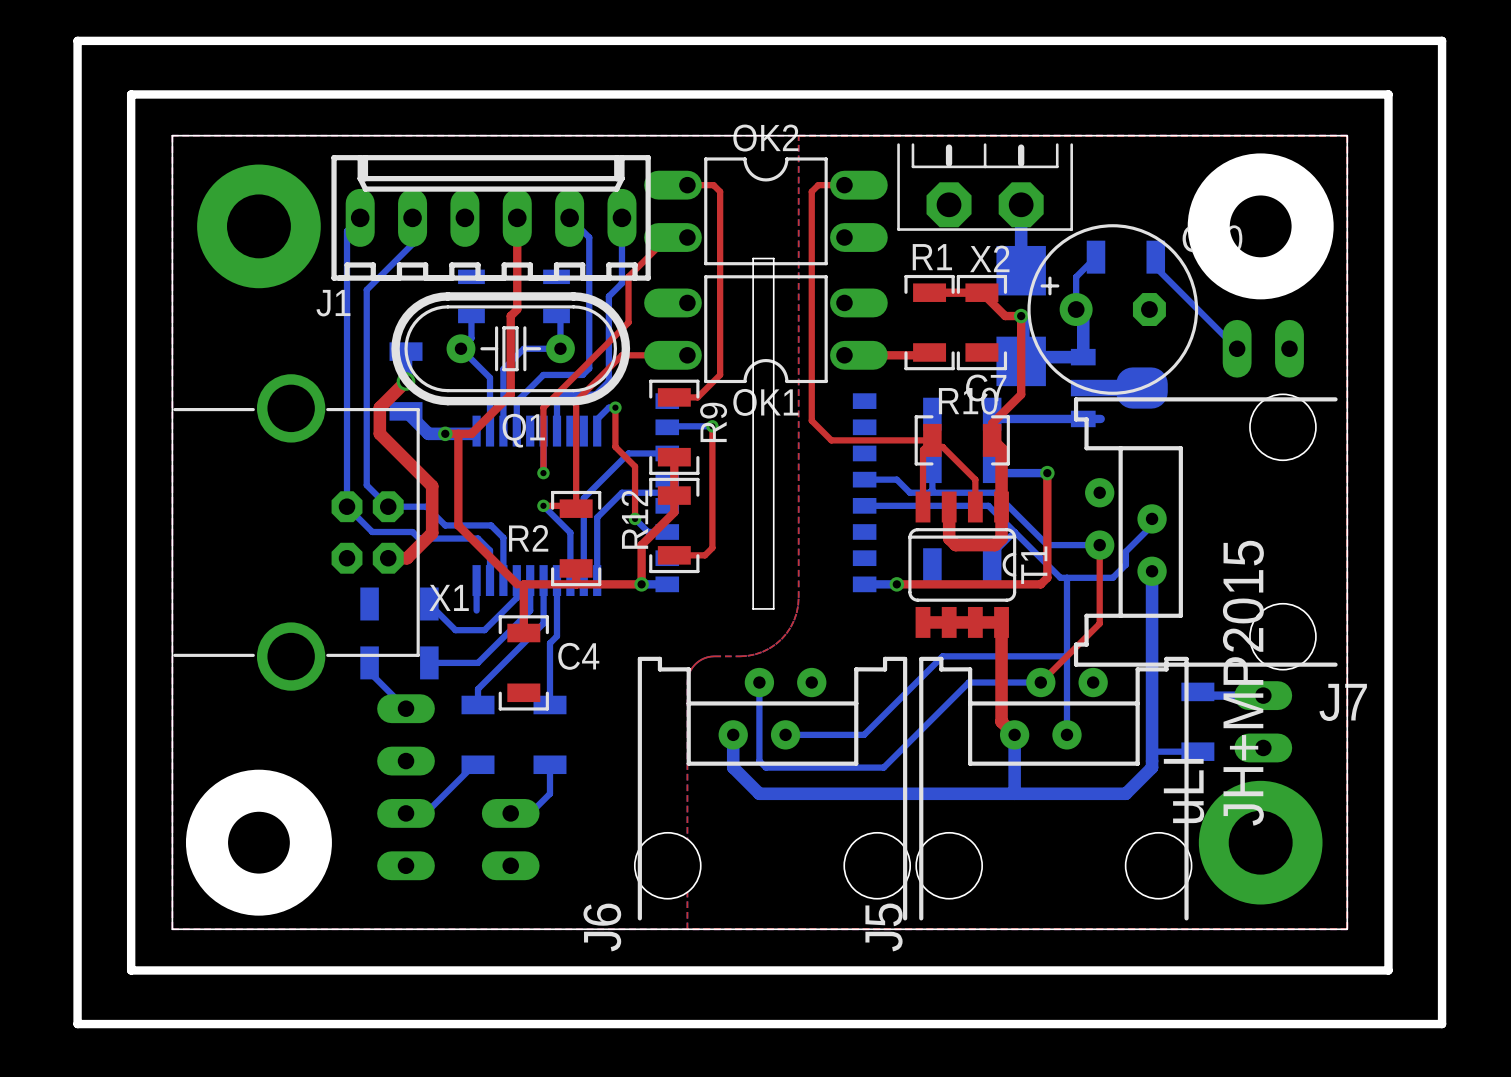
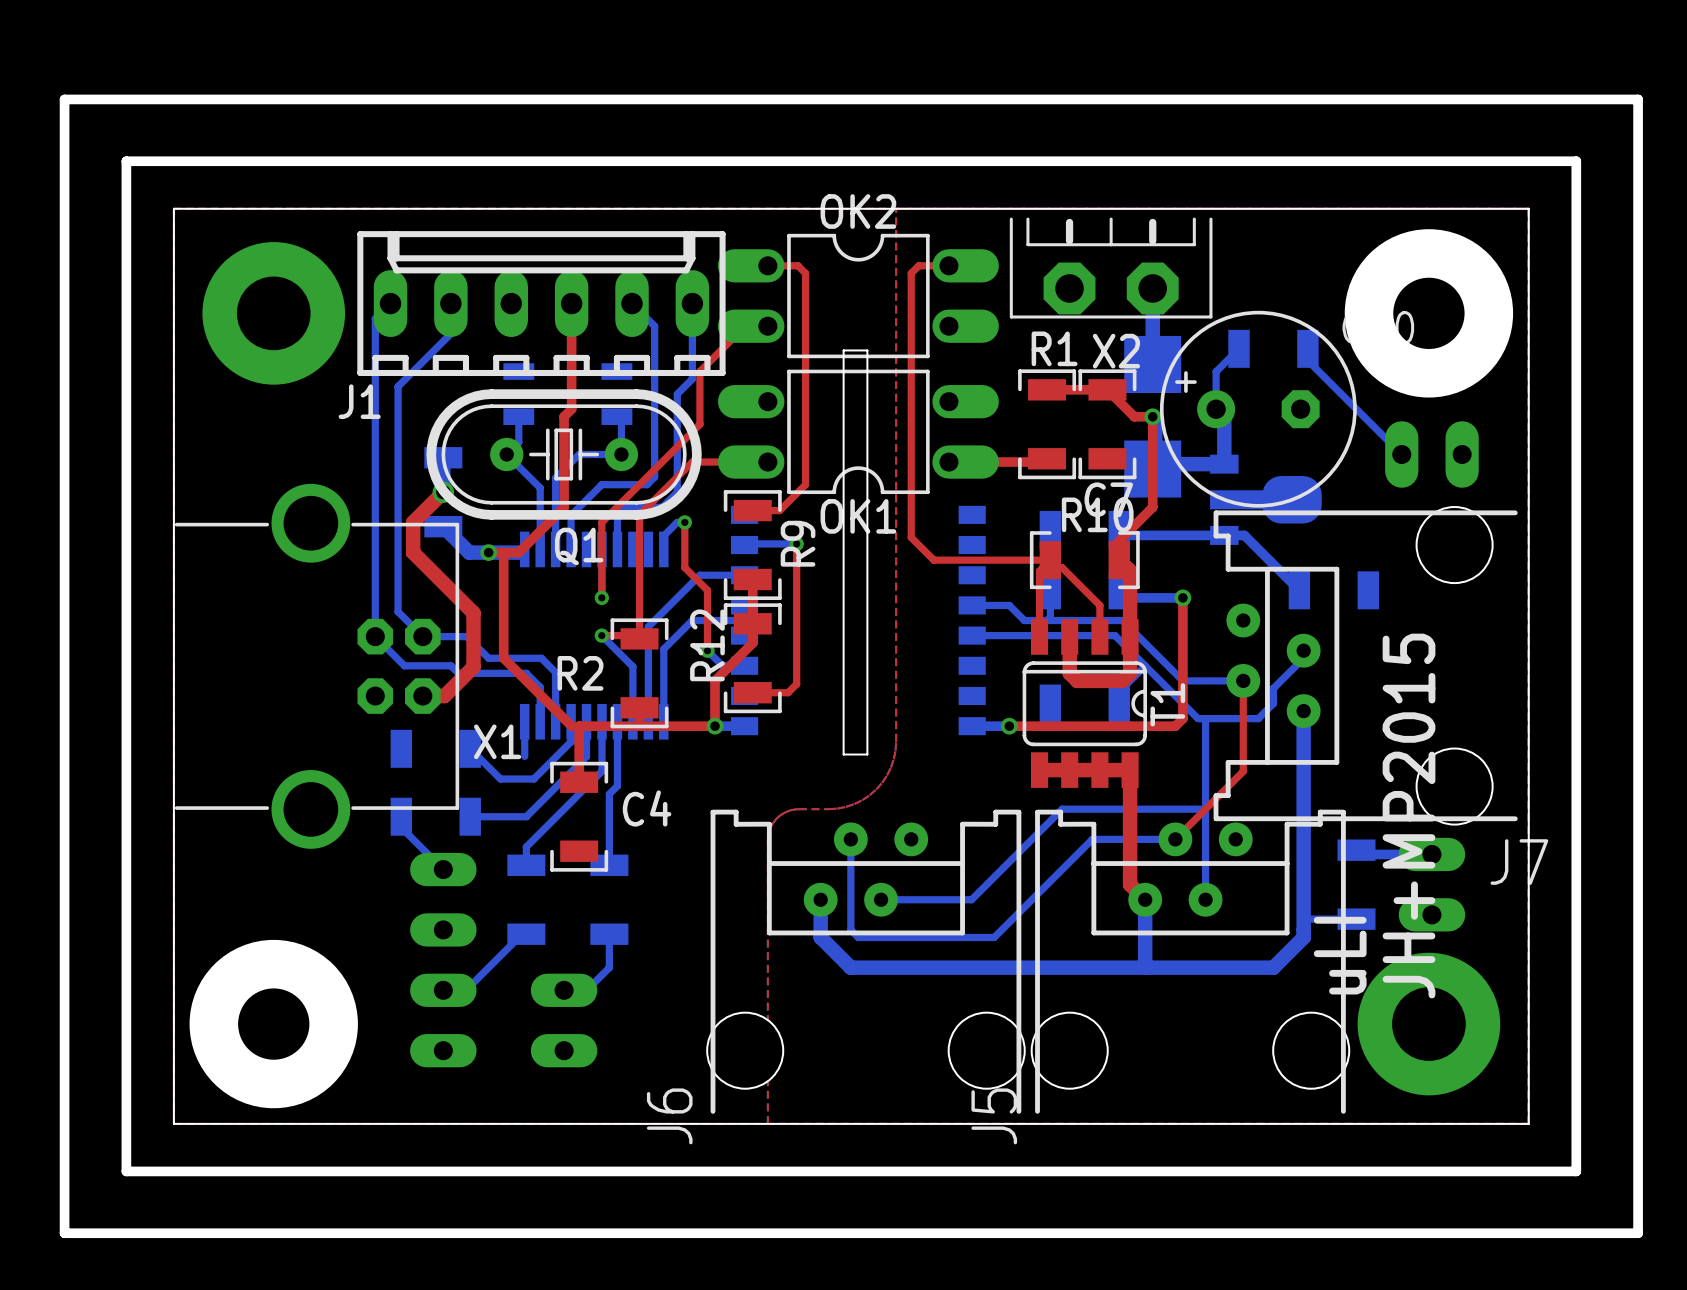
bottom track: none -> (1244, 535) (1299, 590)
part: none -> (1333, 590)

